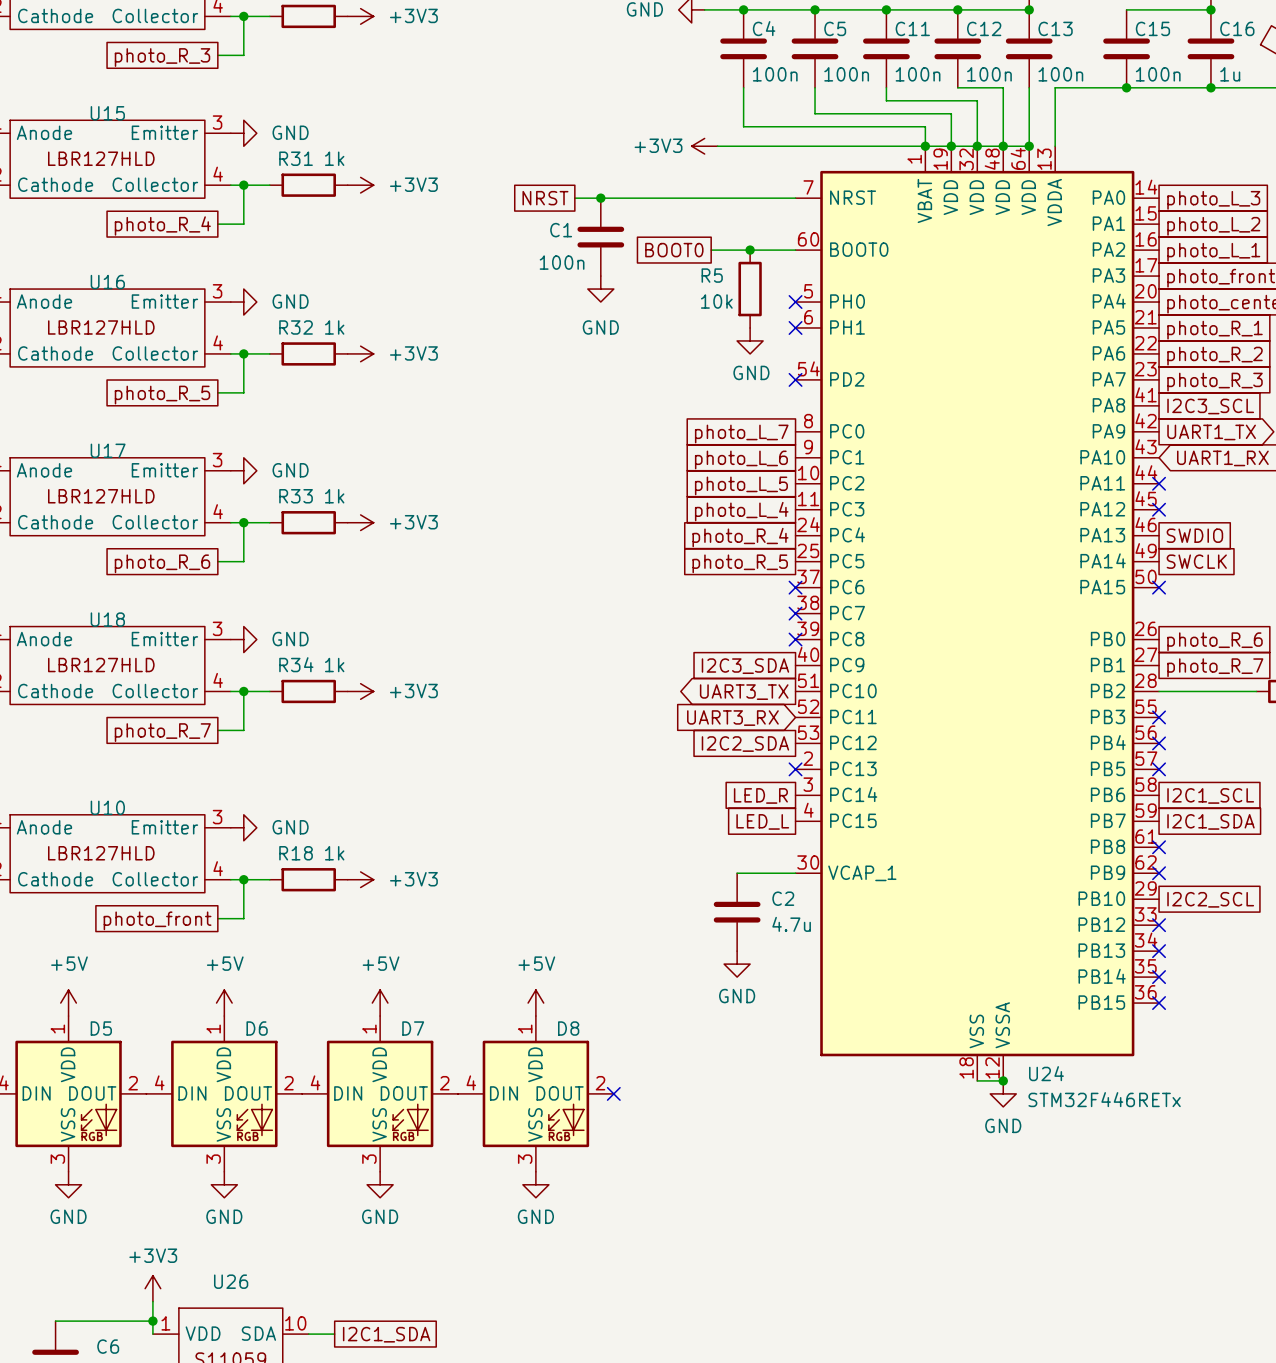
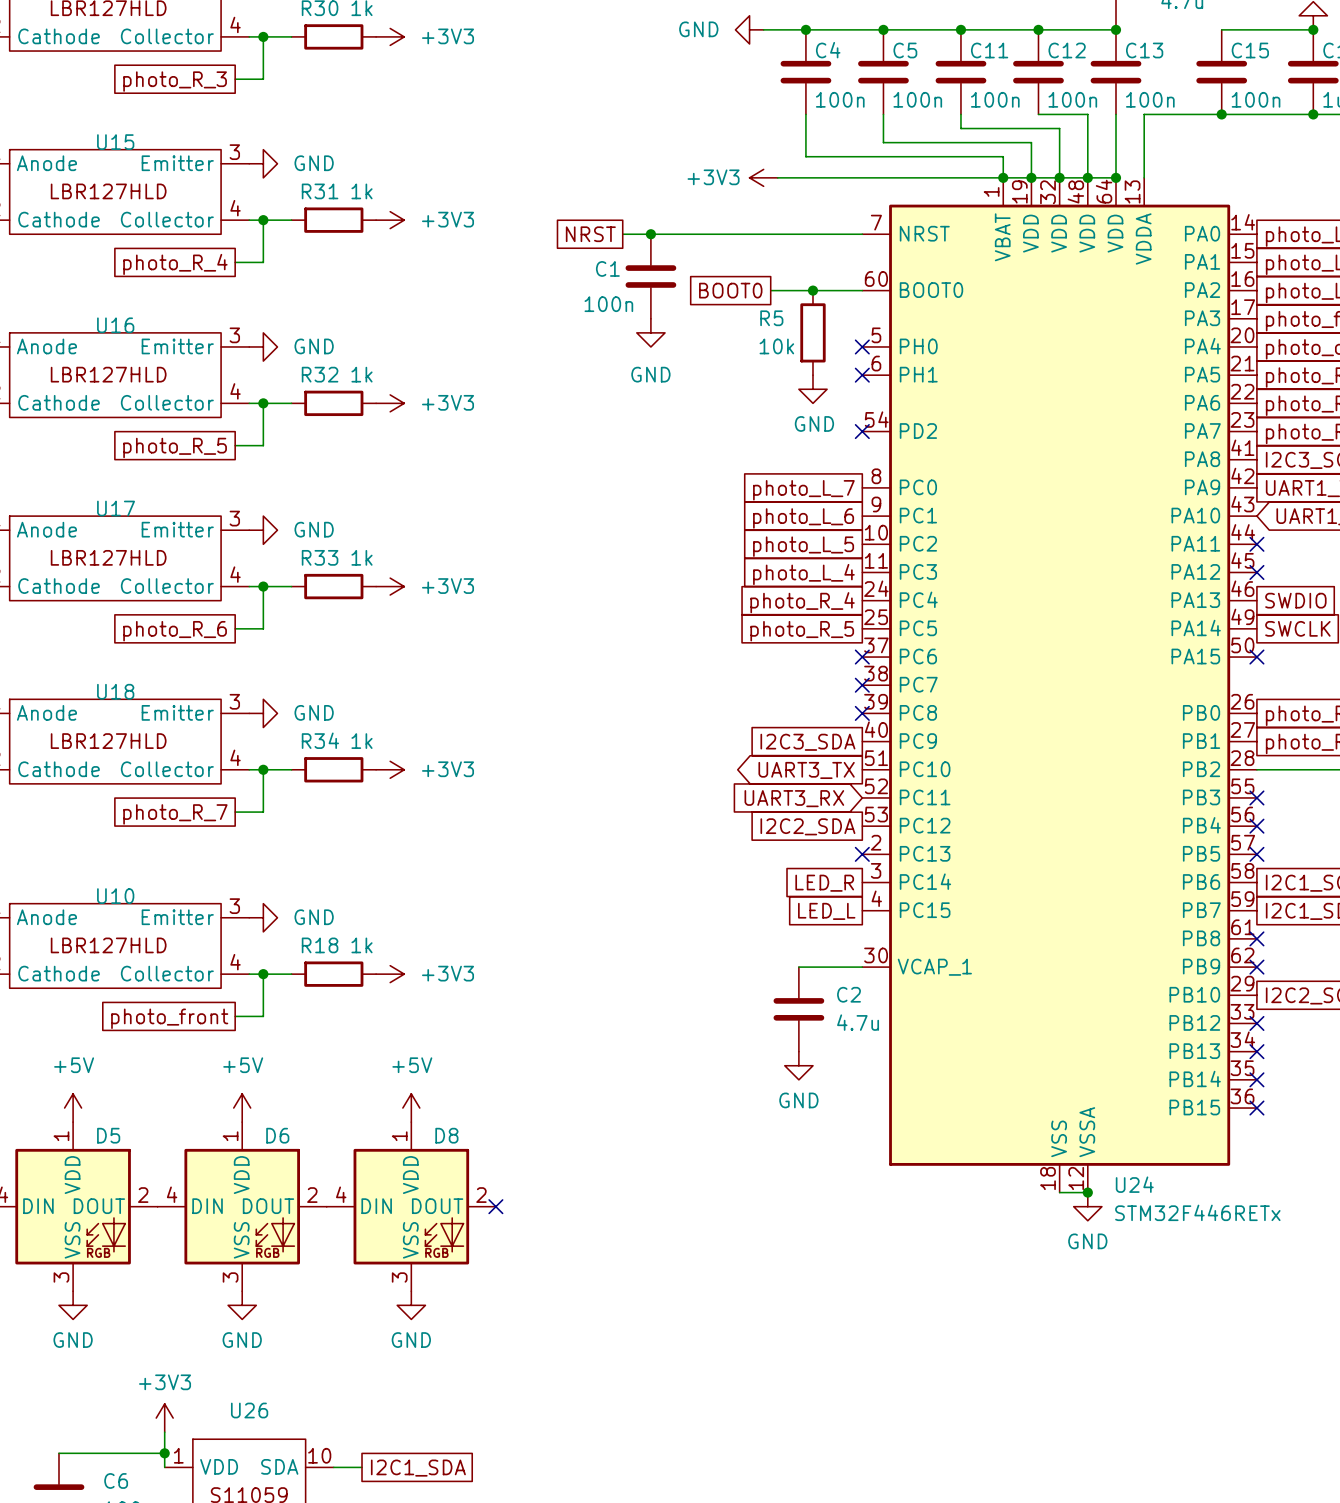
power symbol: +5V (535, 1003) -> none
D7 name: D7 (413, 1028) -> D8 (446, 1135)
no-connect mark: none -> (495, 1206)
D8: (535, 1093) -> none
no-connect mark: (613, 1093) -> none
power symbol: GND (535, 1184) -> none

